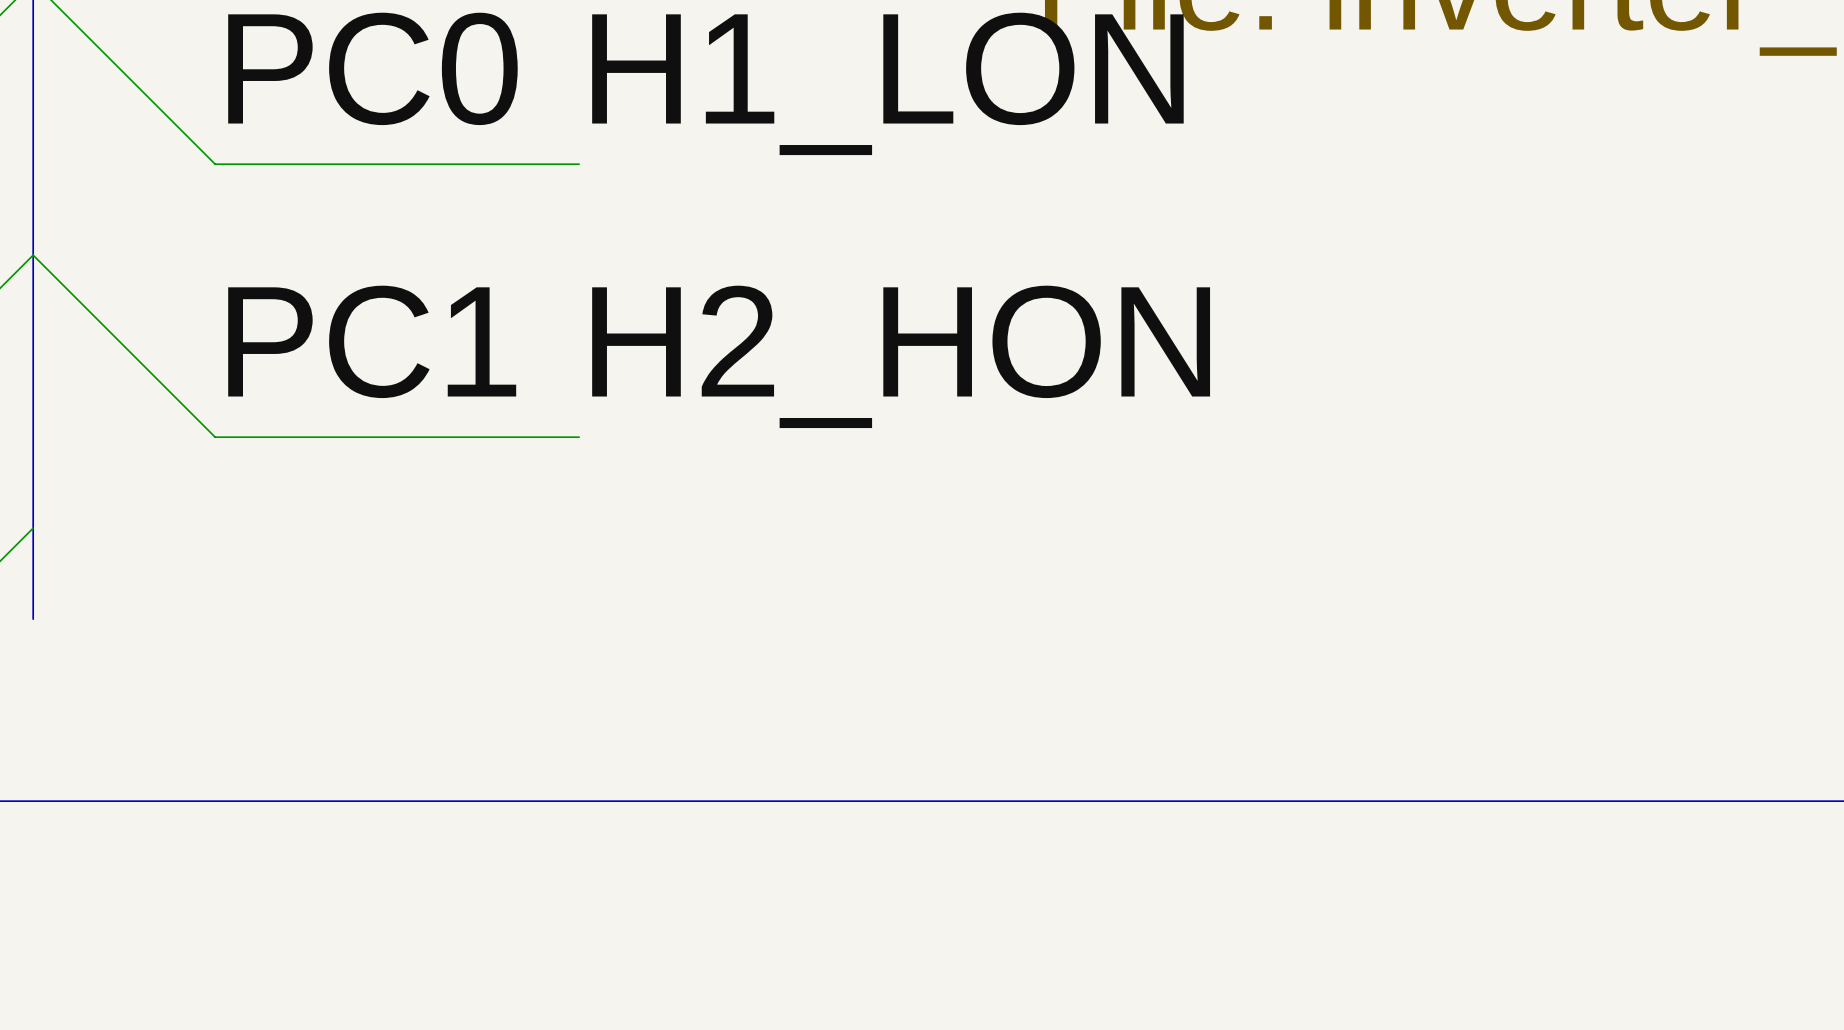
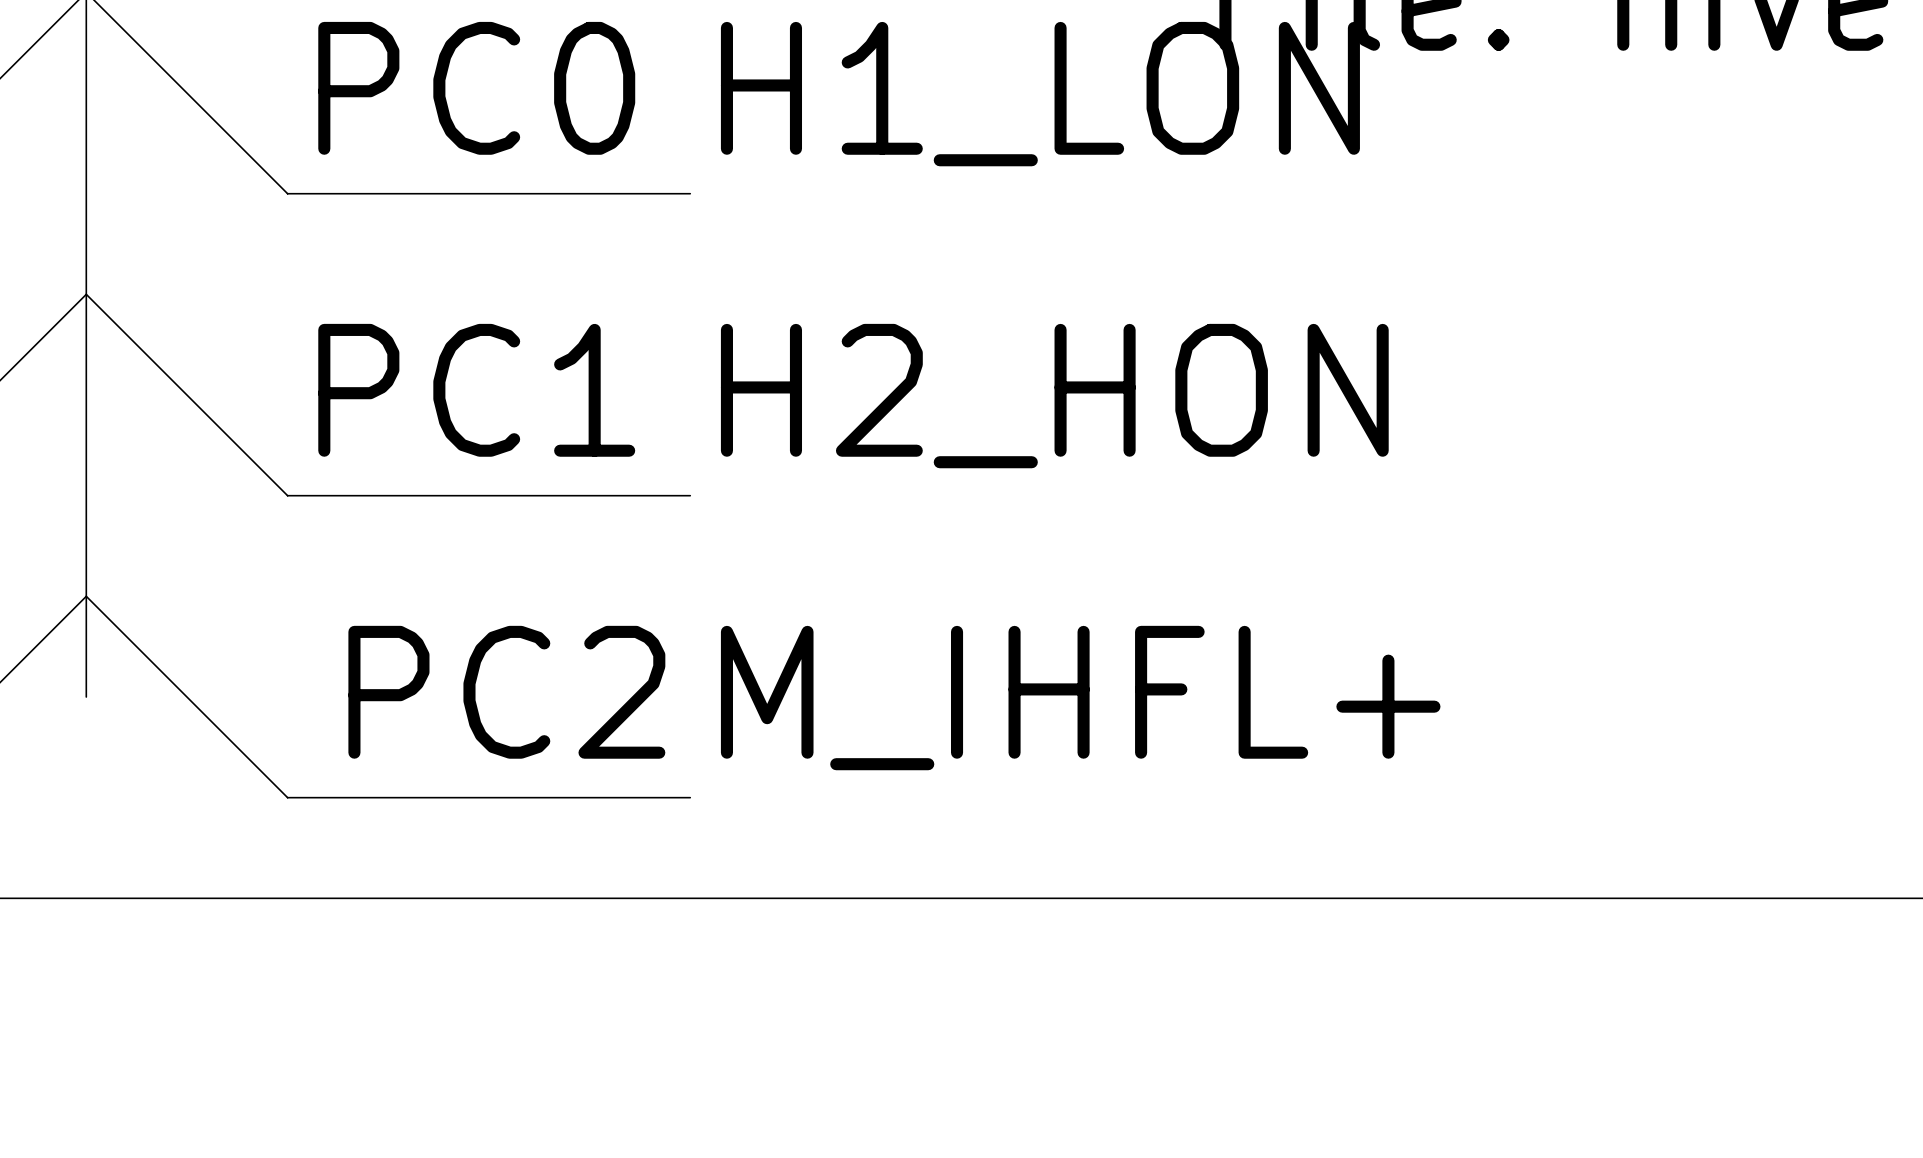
wire: none -> (86, 596) (287, 797) (690, 797)
label: none -> PC2 (506, 692)
label: none -> M_IHFL+ (1080, 698)

